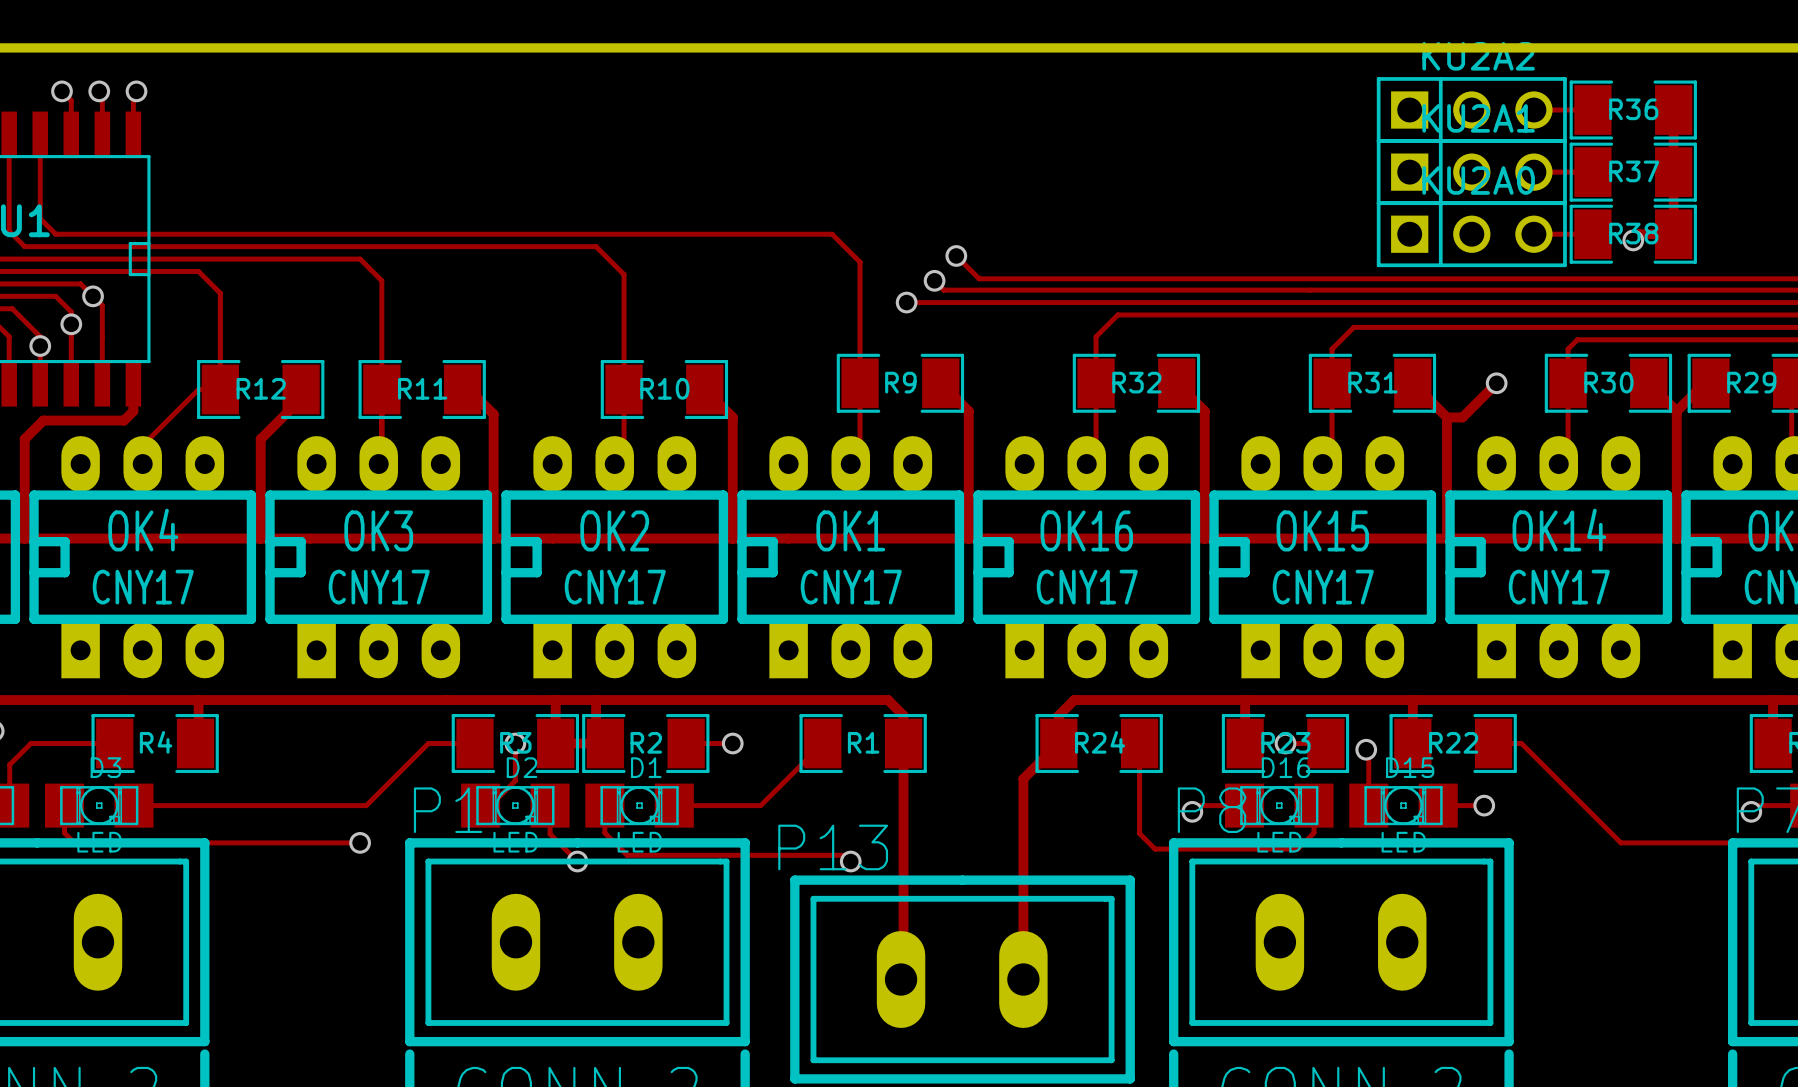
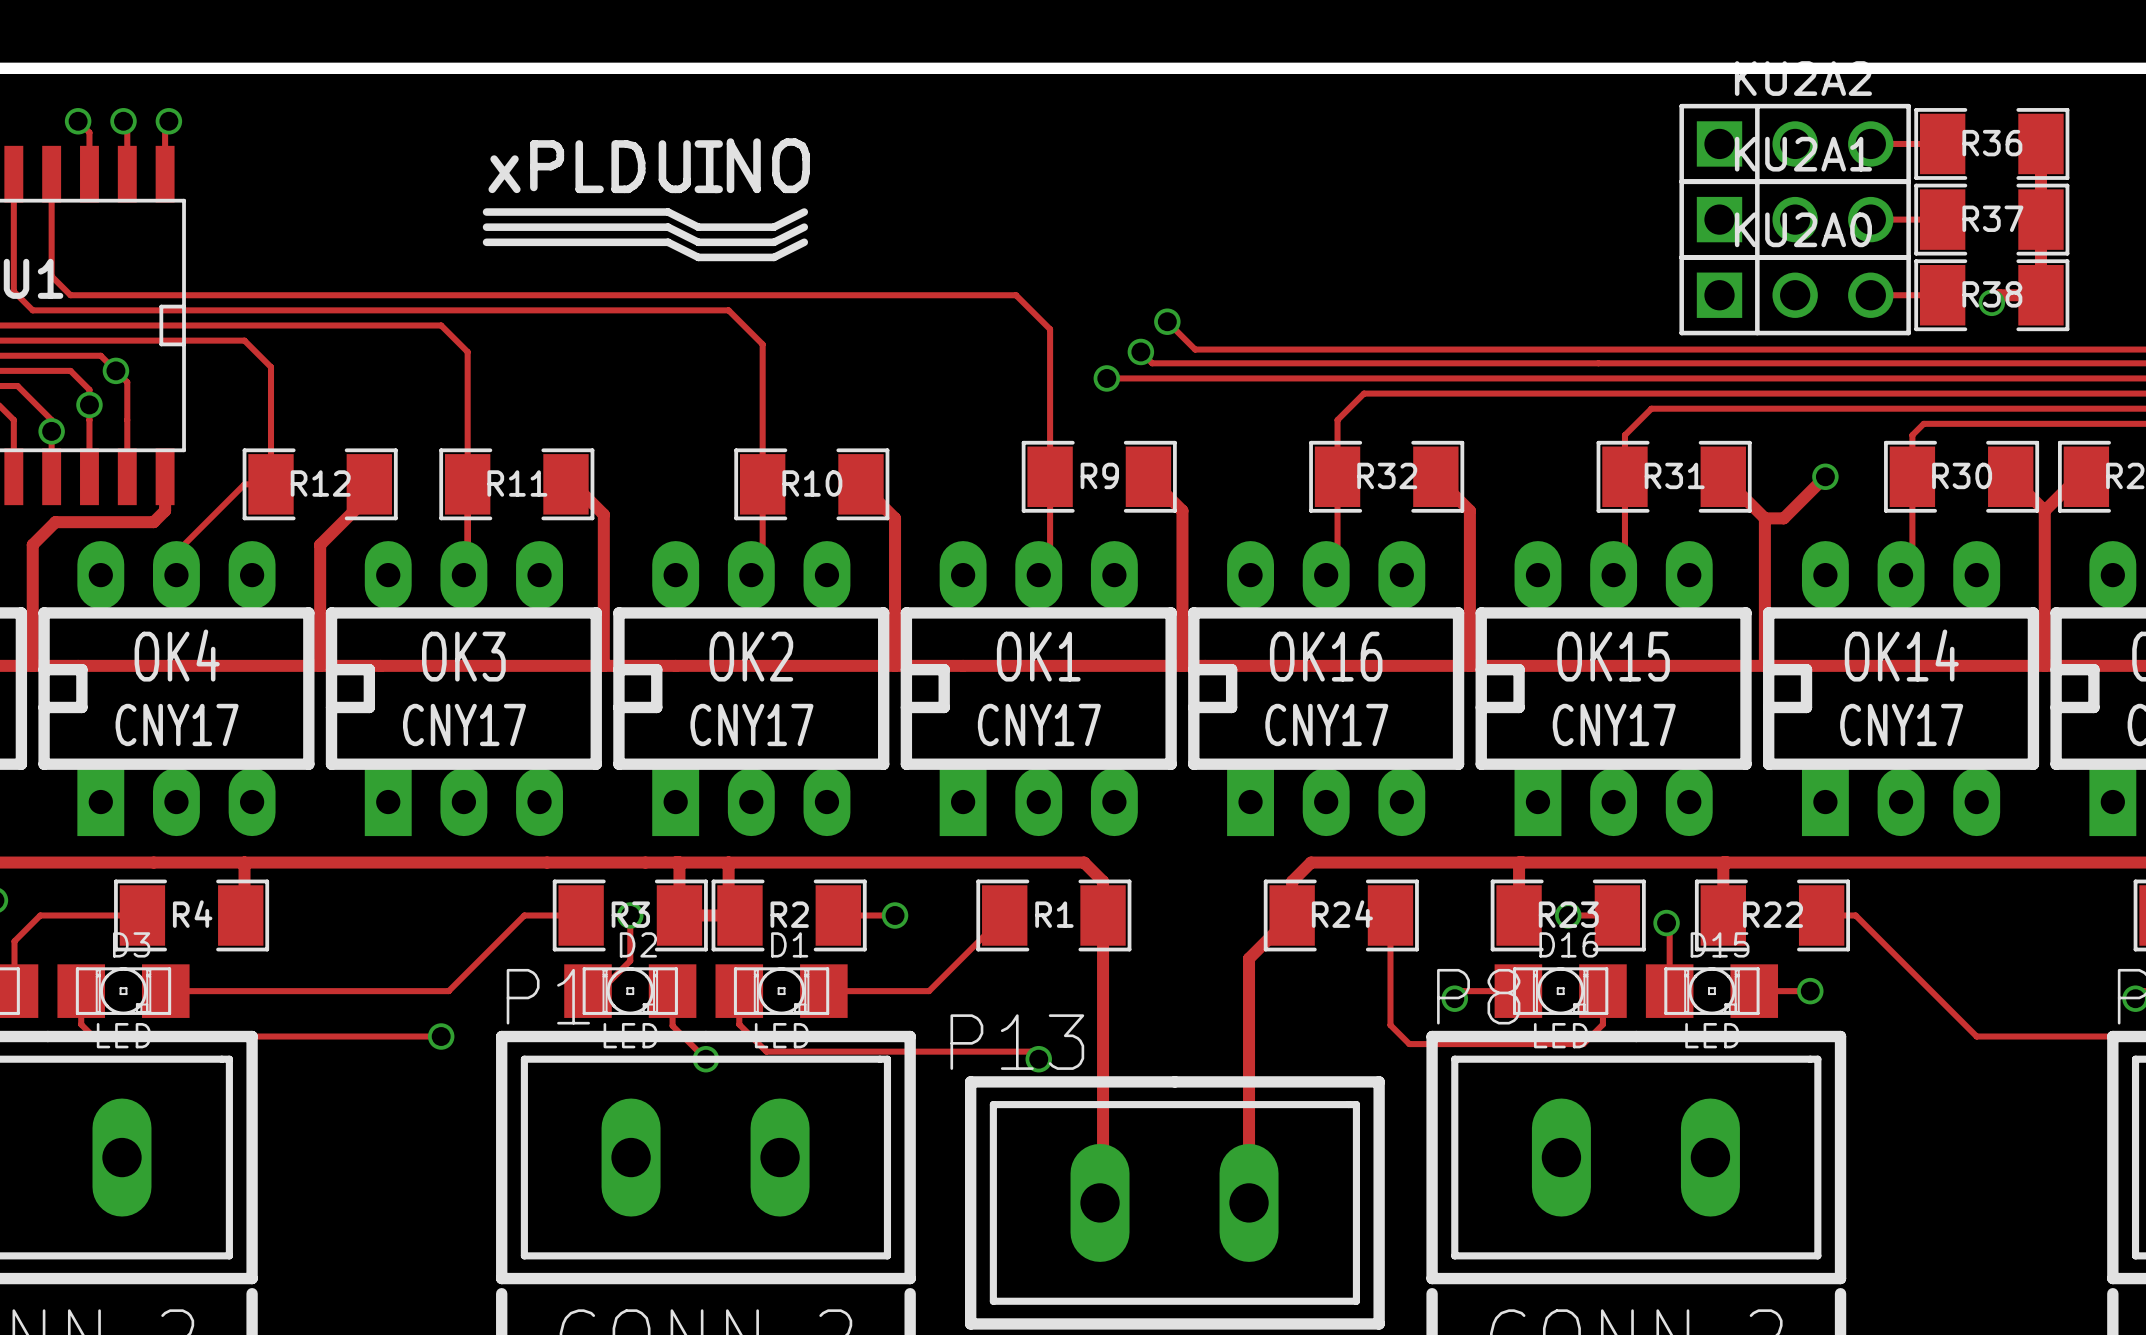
drawing: none -> [482, 138, 810, 262]

